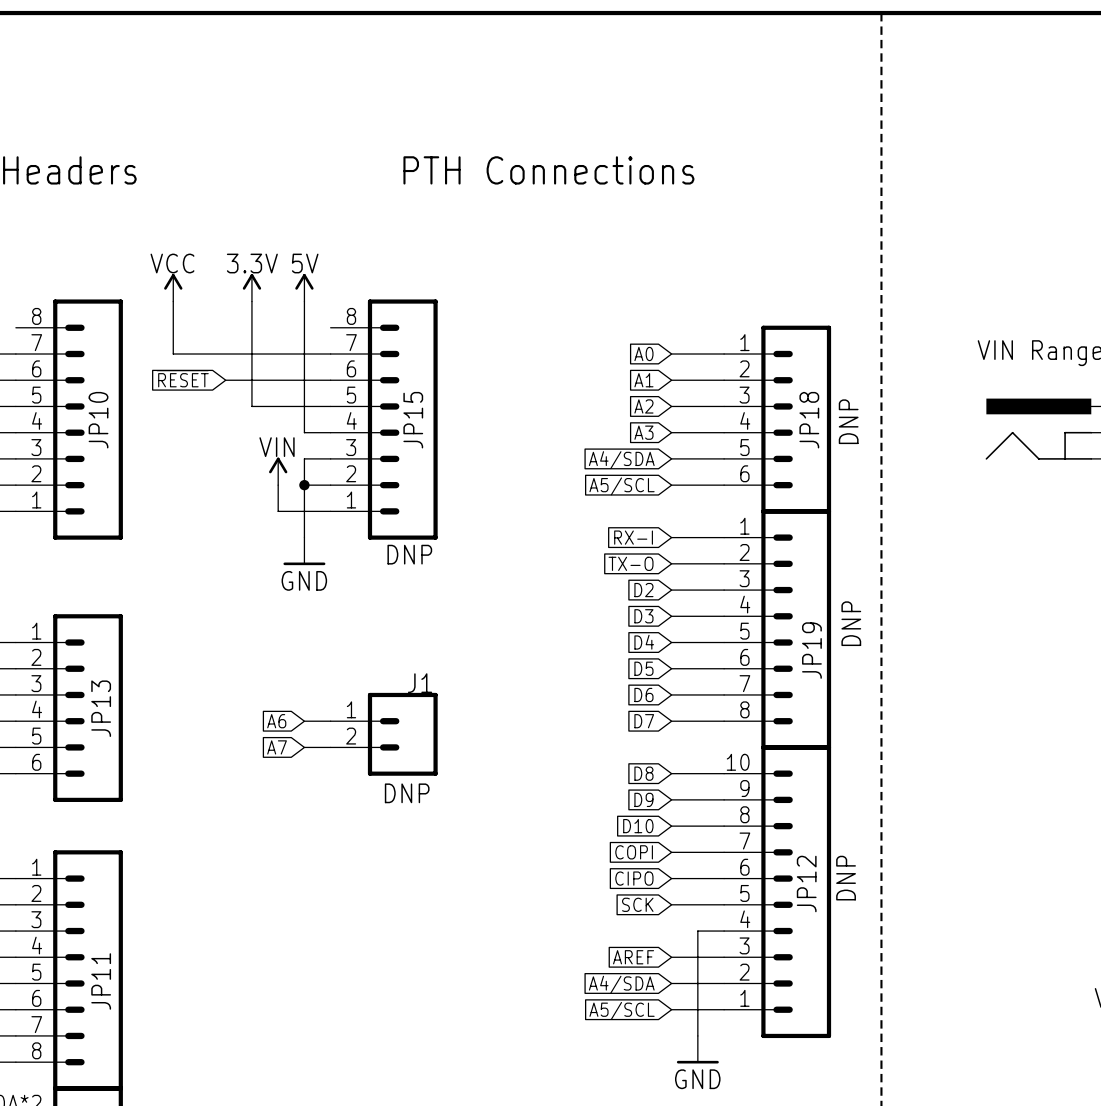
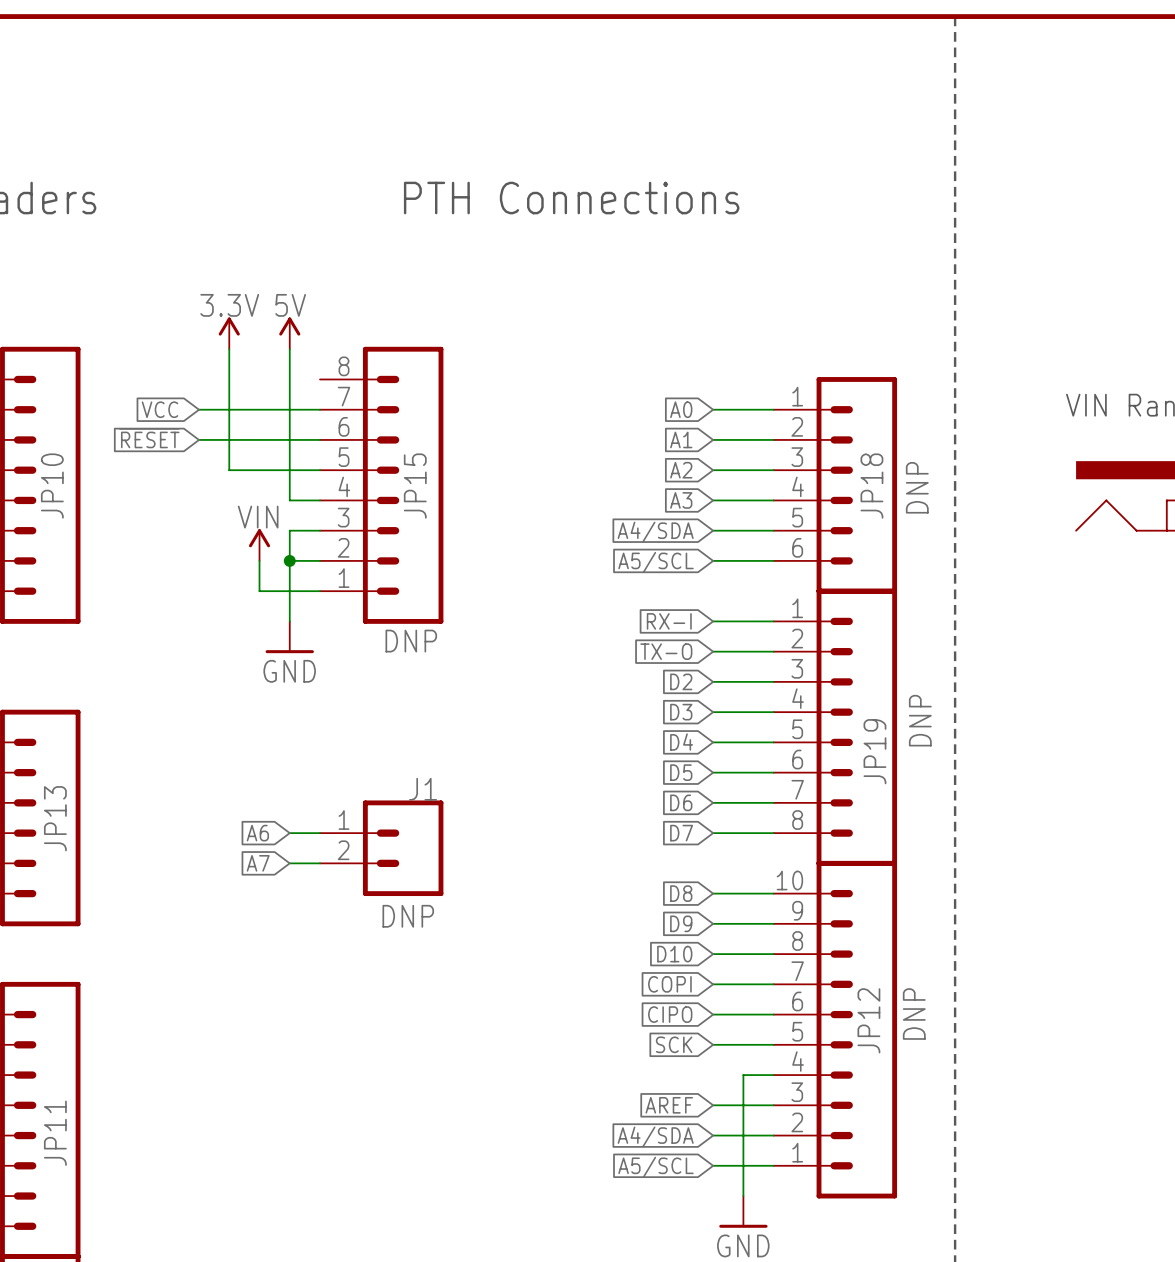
power symbol: VCC (173, 287) -> none
wire: (173, 301) (173, 354) (225, 354) -> none
global label: none -> VCC (160, 409)

